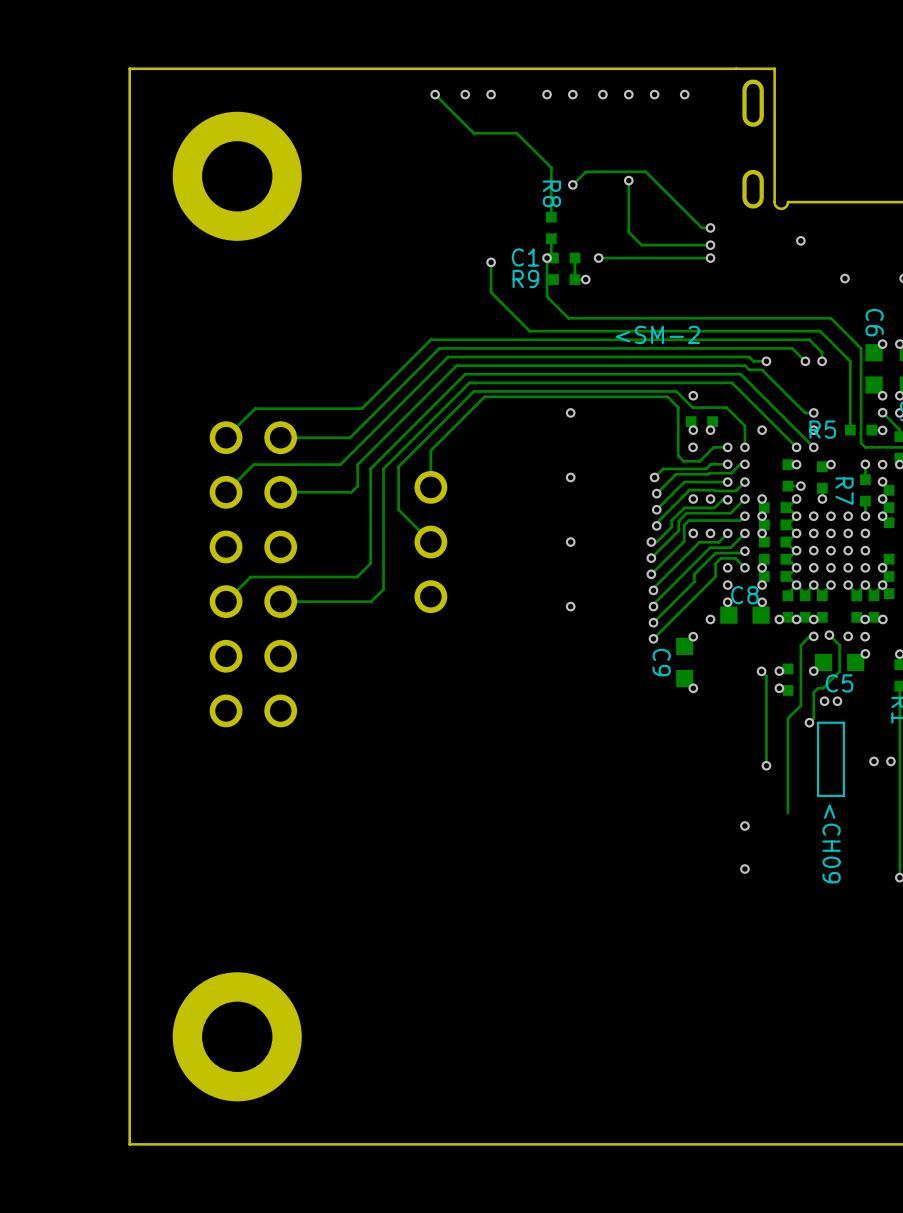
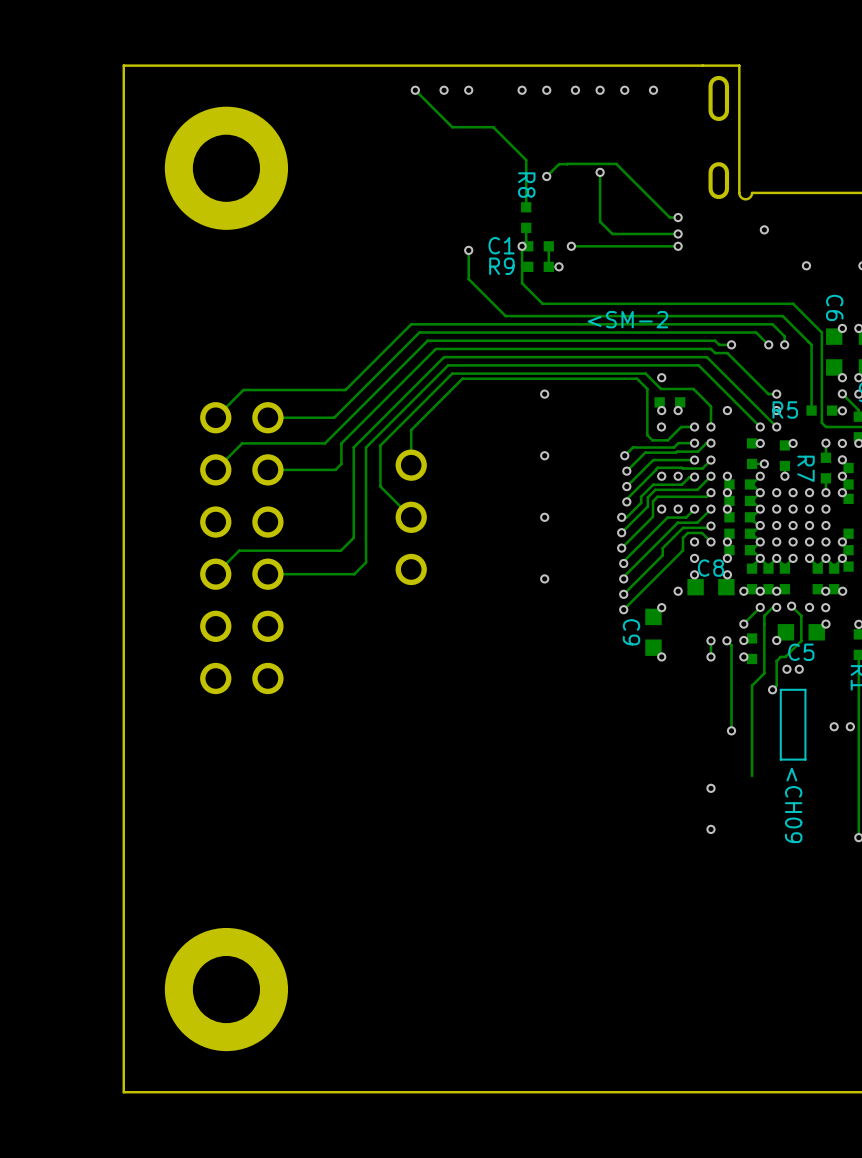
track: none -> (760, 607) (743, 623)
via: none -> (760, 607)
via: none -> (743, 624)
track: none -> (710, 640) (710, 656)
via: none -> (710, 640)
via: none -> (710, 656)

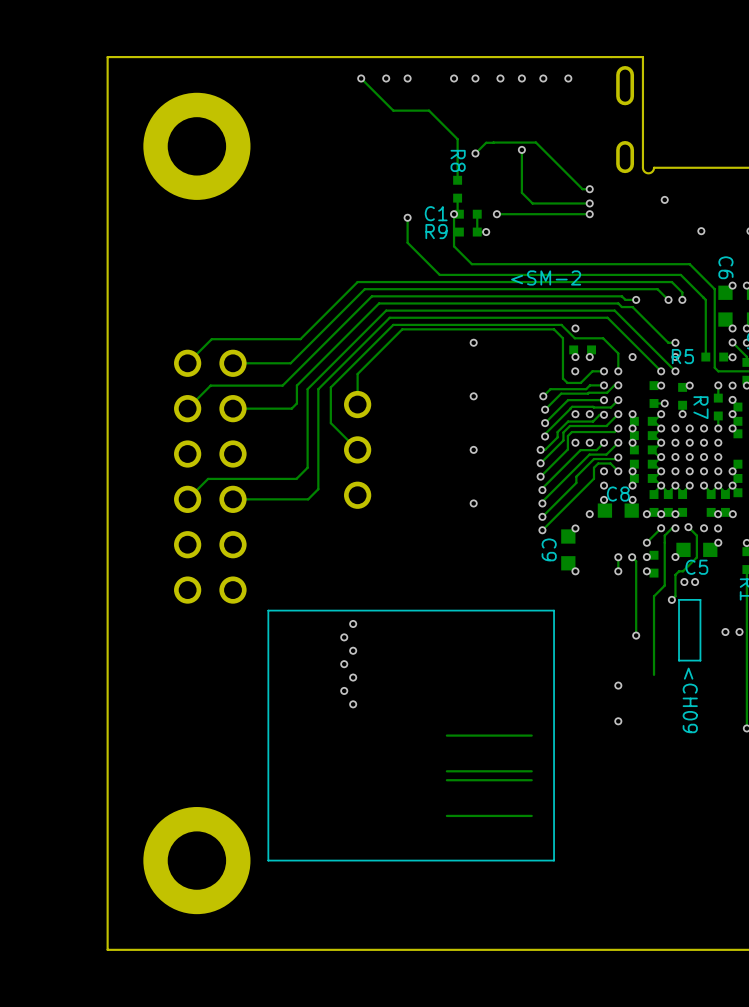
line: none -> (554, 610) (268, 610) (268, 860) (554, 860) (554, 610)
via: none -> (353, 623)
via: none -> (344, 637)
via: none -> (353, 650)
via: none -> (344, 664)
via: none -> (353, 677)
via: none -> (344, 690)
via: none -> (353, 704)
track: none -> (531, 735) (446, 735)
track: none -> (531, 771) (446, 771)
track: none -> (531, 780) (446, 780)
track: none -> (531, 815) (446, 815)

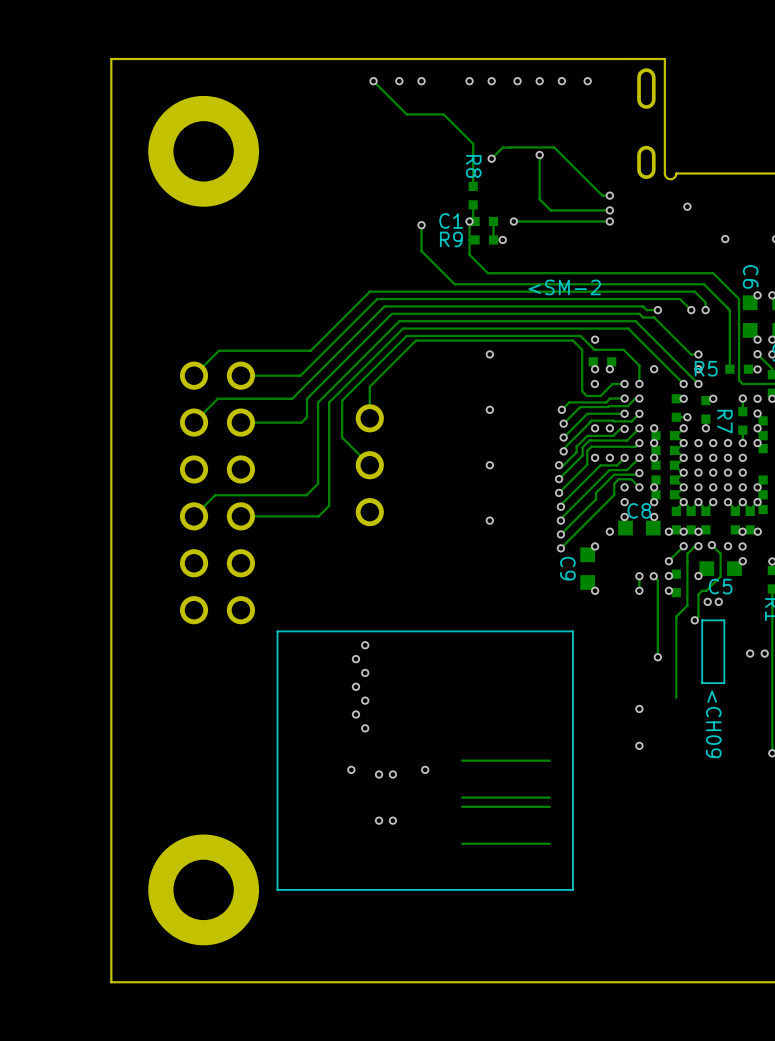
via: none -> (351, 769)
via: none -> (425, 769)
via: none -> (379, 774)
via: none -> (392, 774)
via: none -> (379, 820)
via: none -> (392, 820)

